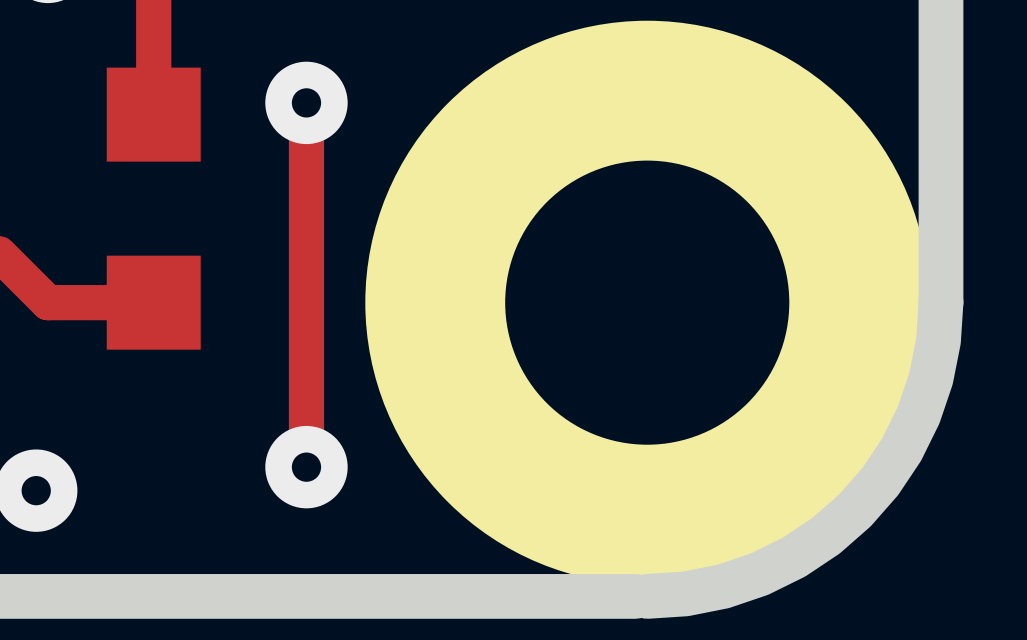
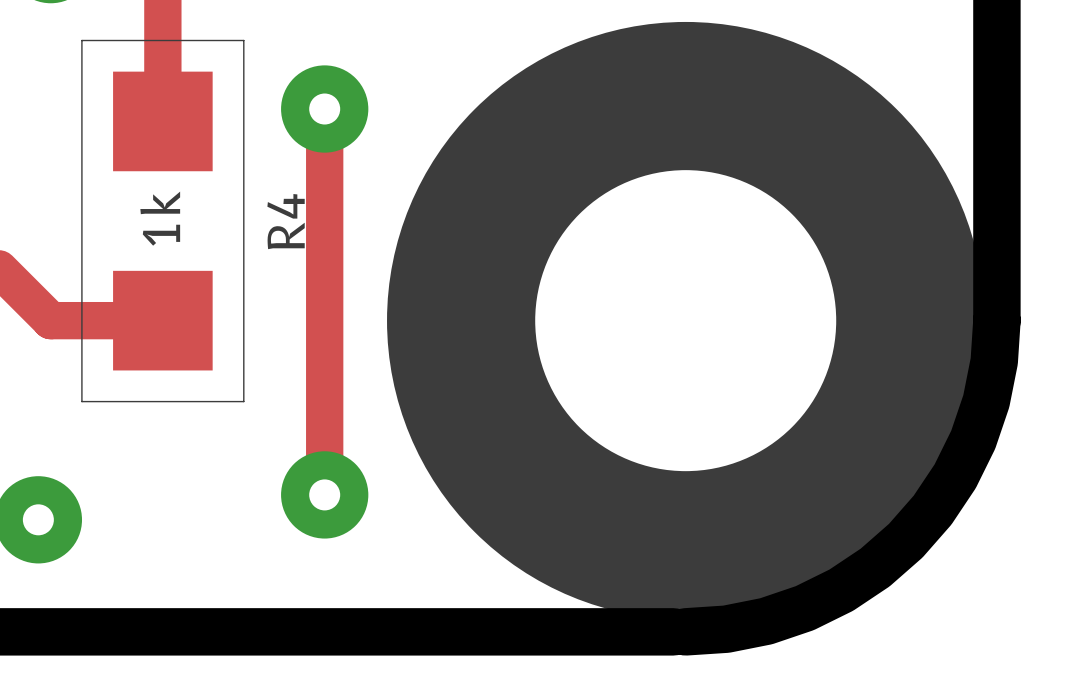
R4: none -> 1k (162, 221)

